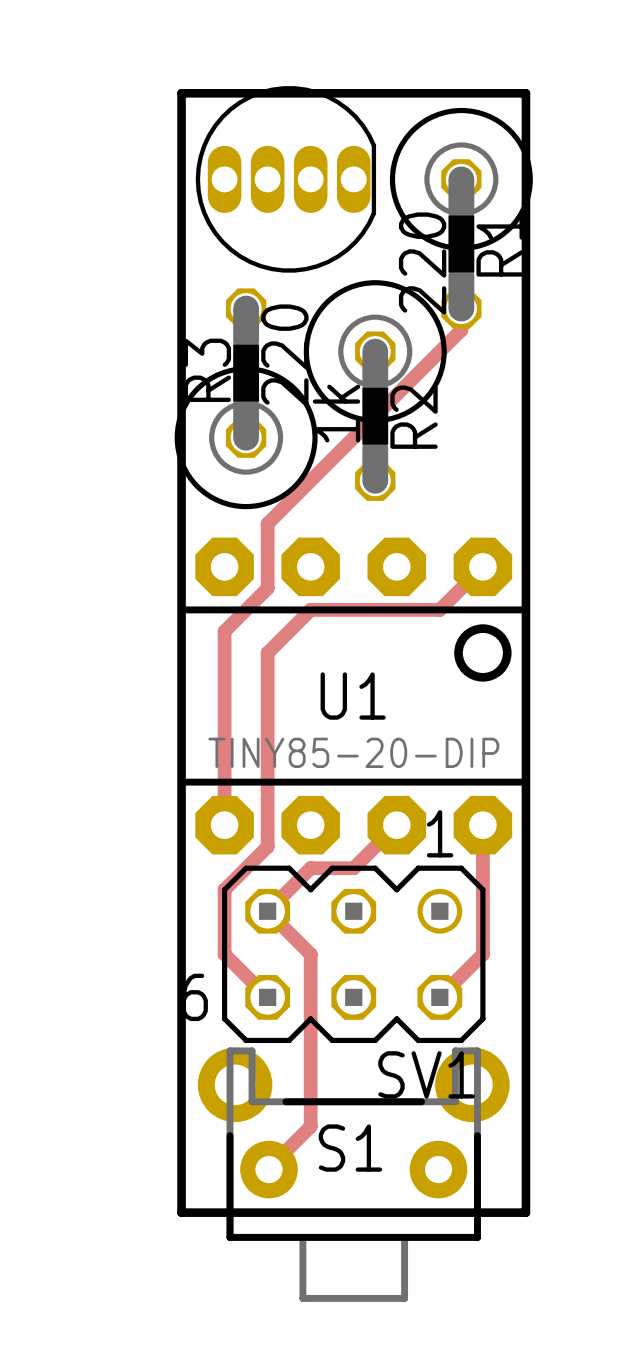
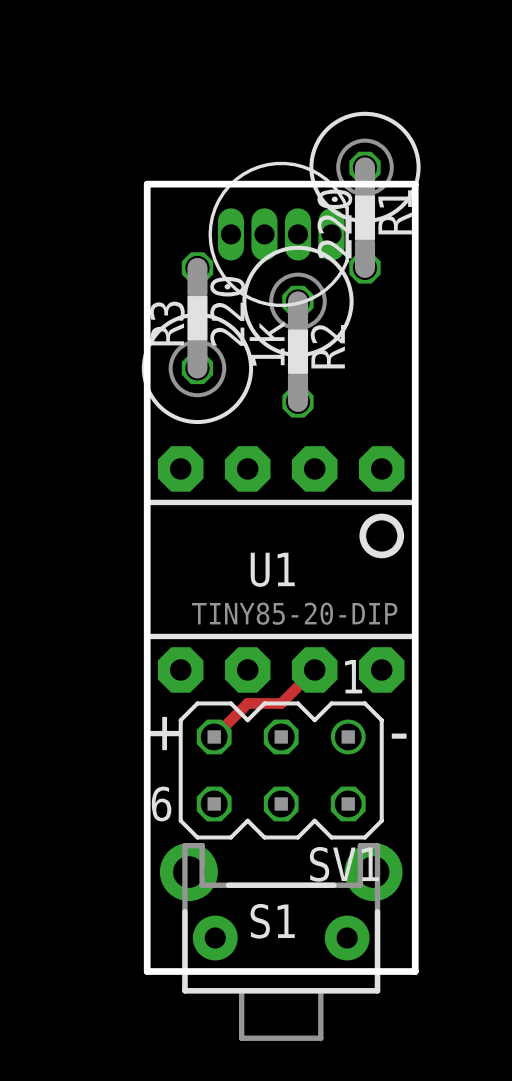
part position: (285, 179) -> (278, 234)
board edge: (181, 200) (181, 93) (525, 93) (525, 200) -> (147, 184) (415, 184)
track: (461, 308) (461, 330) (267, 523) (267, 588) (224, 631) (224, 825) -> none
track: (482, 566) (439, 609) (310, 609) (267, 652) (267, 846) (224, 889) (224, 954) (267, 997) -> none
track: (482, 825) (482, 954) (439, 997) -> none
text: none -> + (164, 733)
text: none -> - (399, 736)
track: (267, 911) (310, 954) (310, 1126) (268, 1169) -> none

